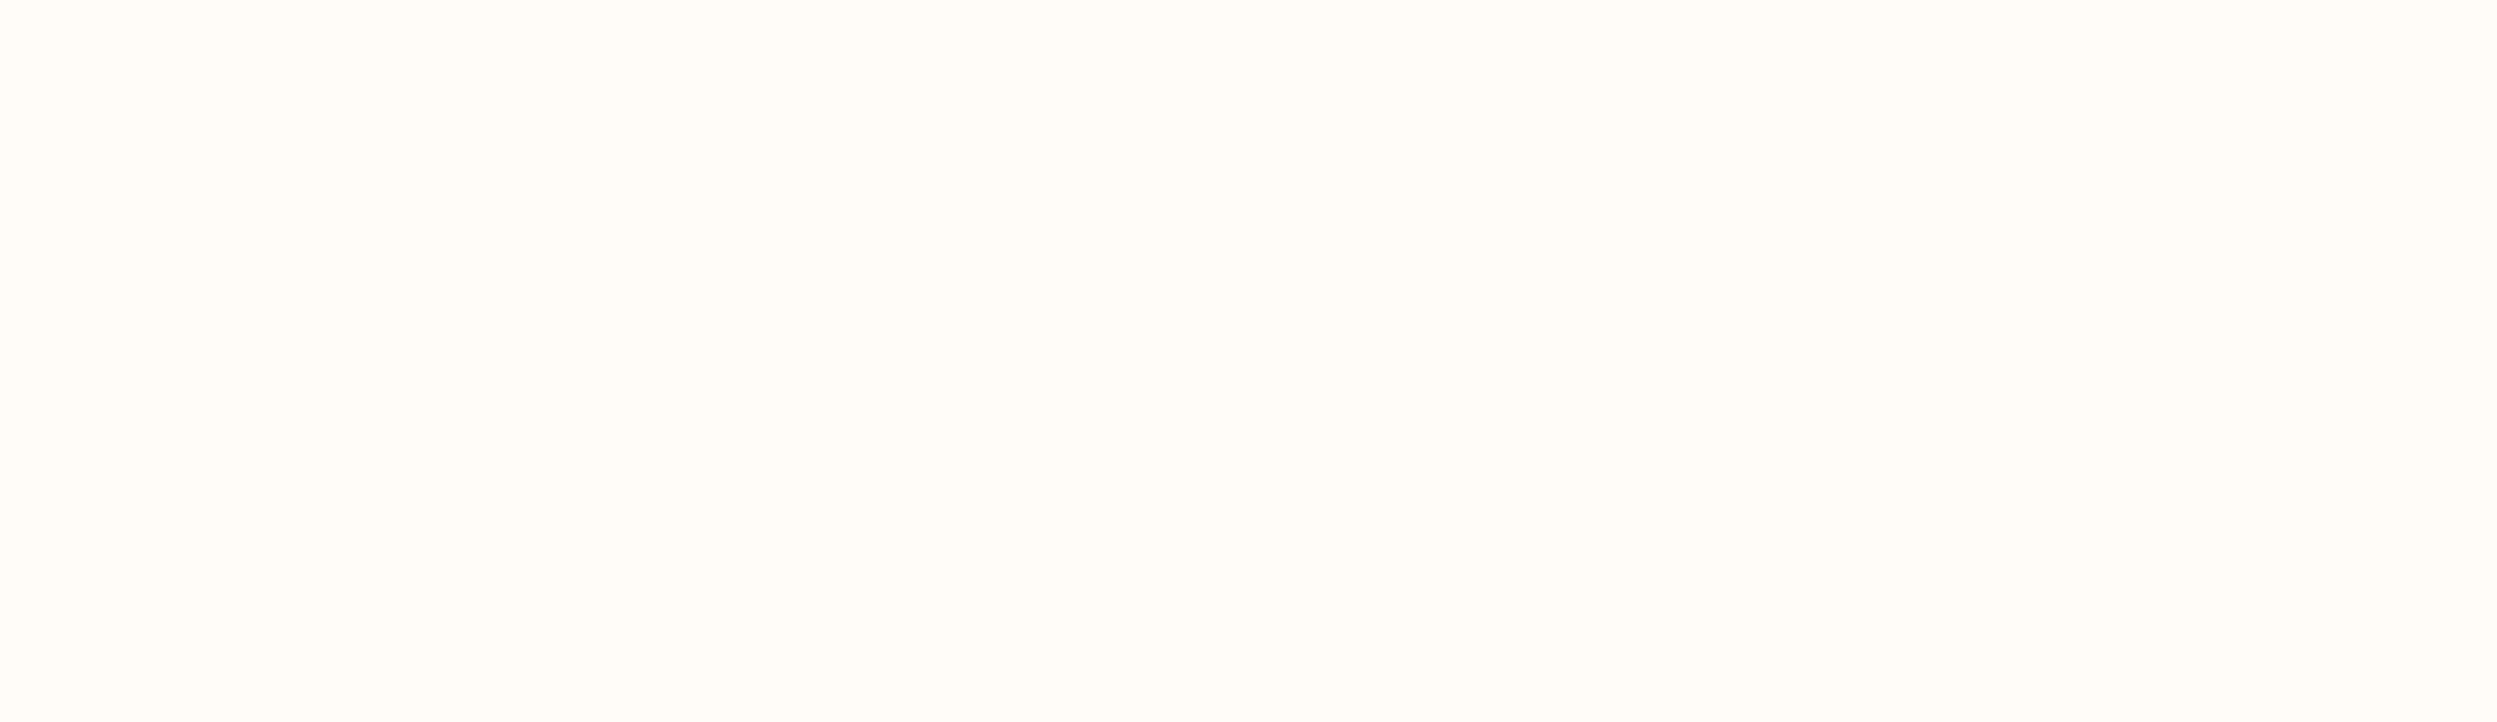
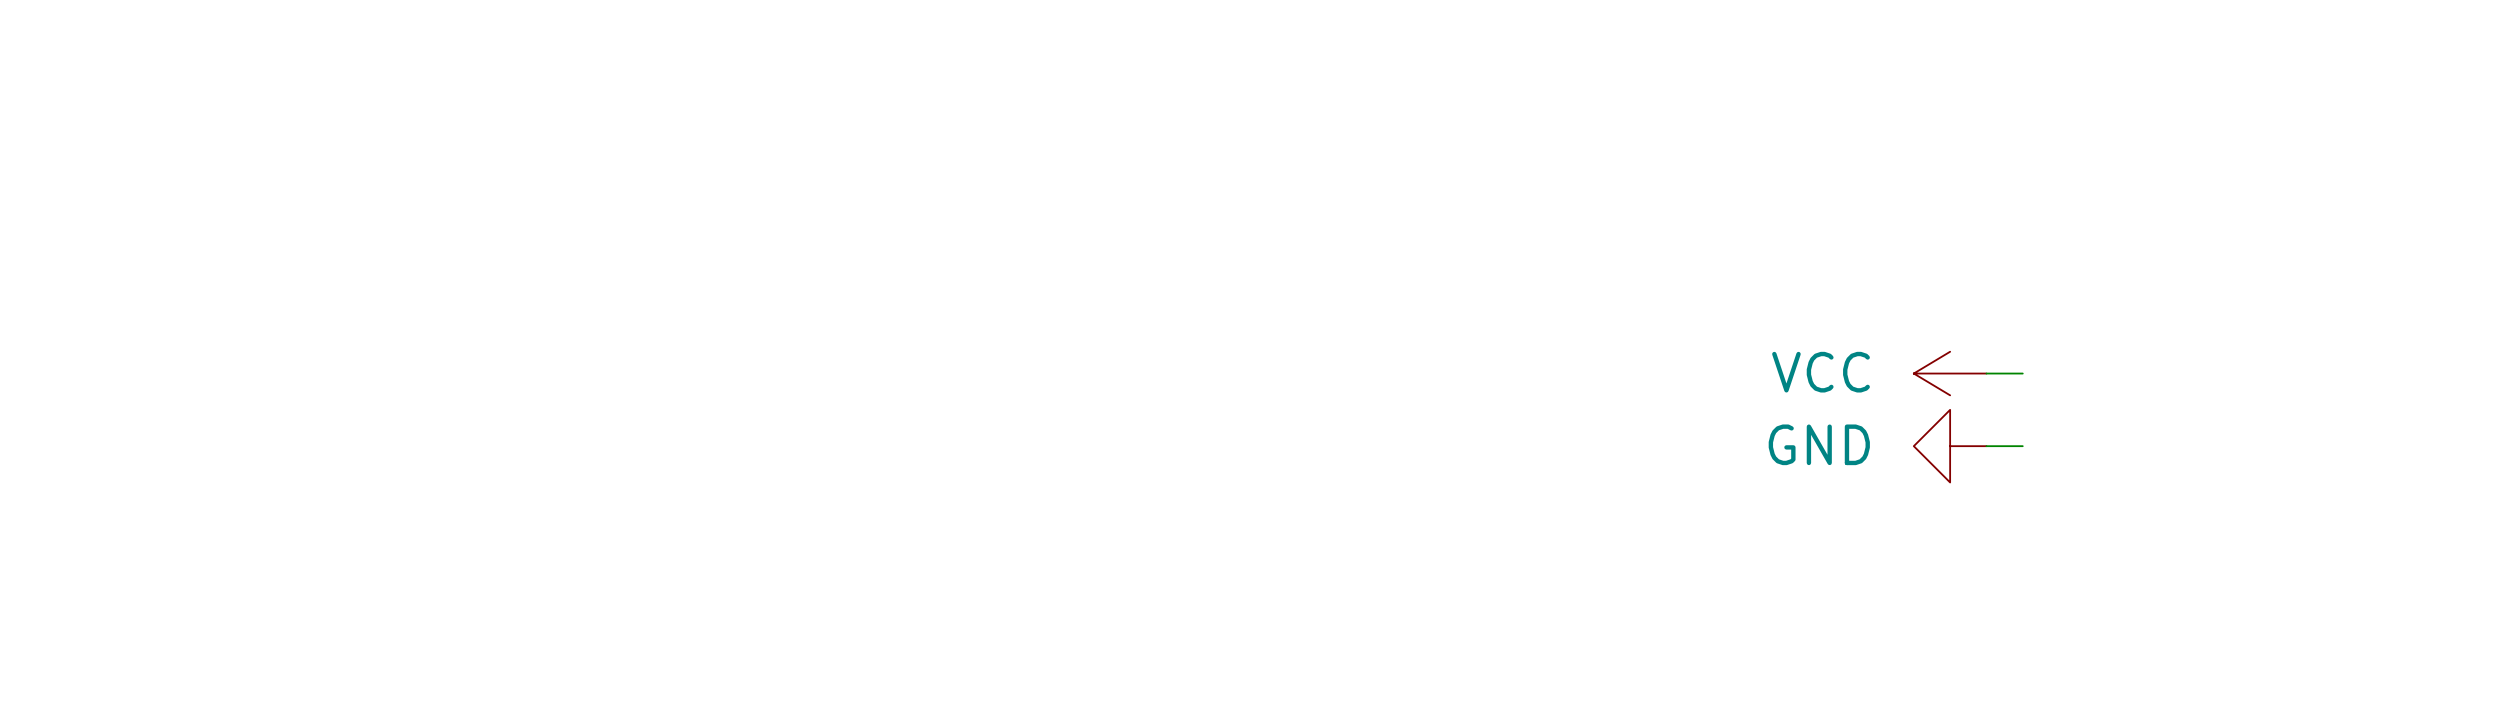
power symbol: none -> VCC (1950, 373)
wire: none -> (1986, 373) (2022, 373)
power symbol: none -> GND (1950, 446)
wire: none -> (1986, 446) (2022, 446)

